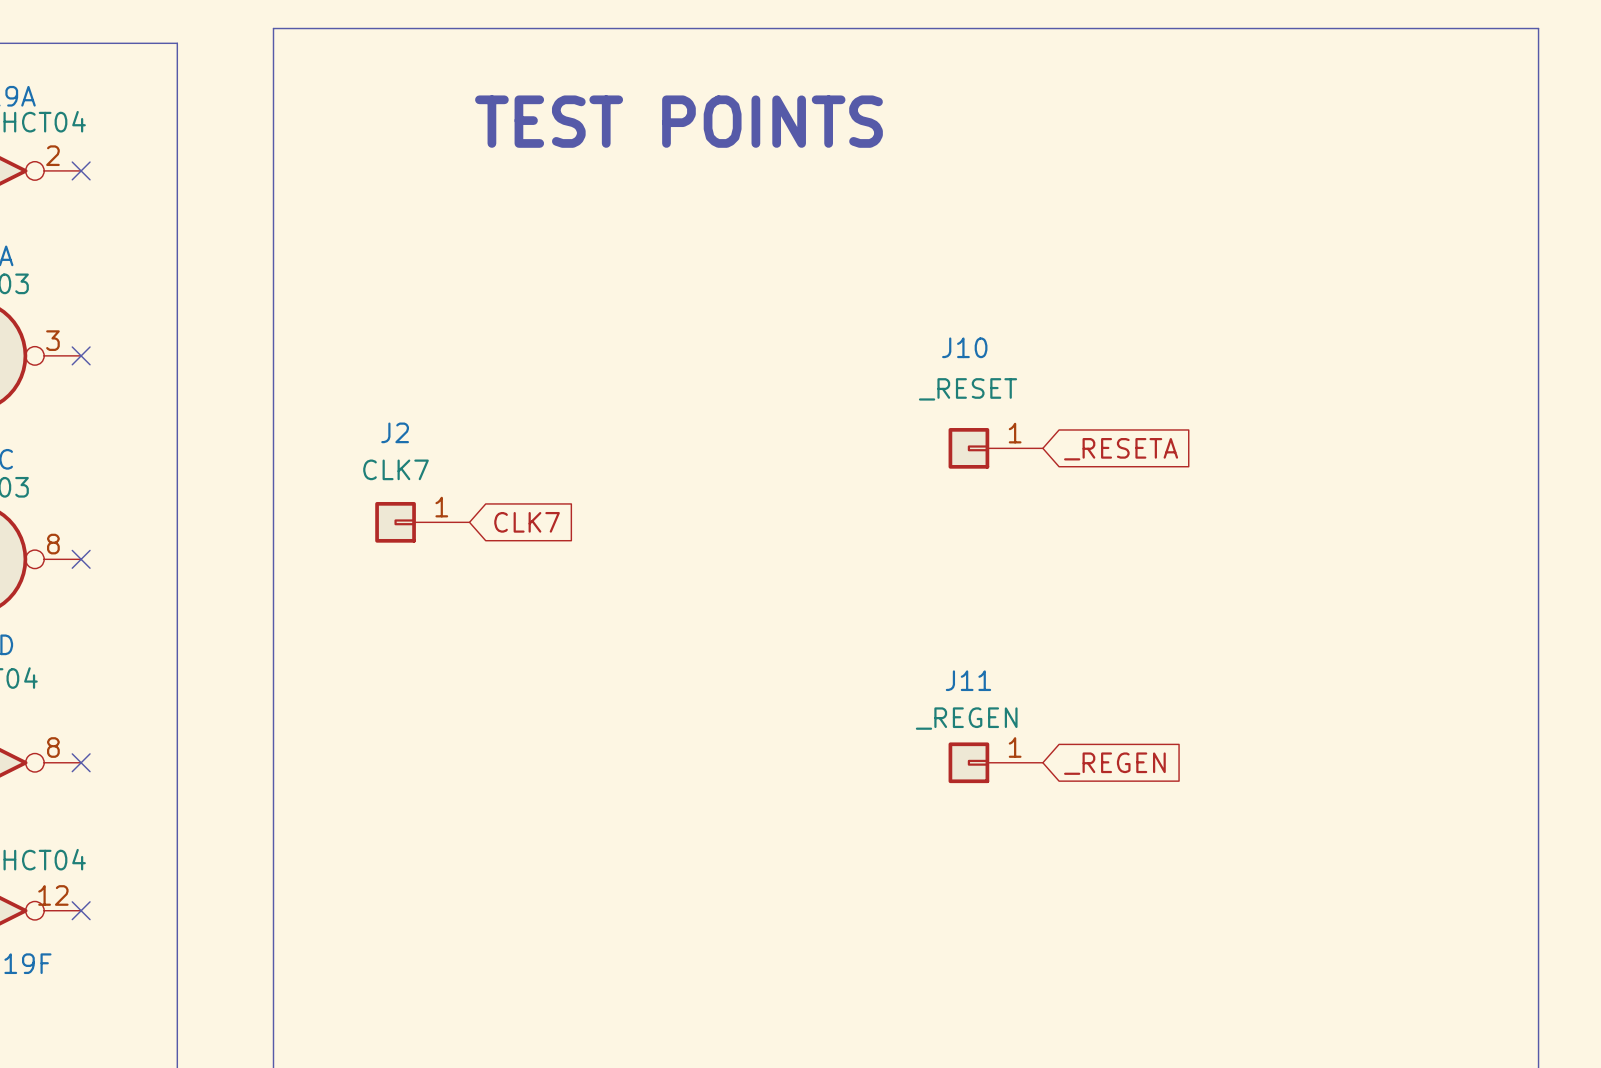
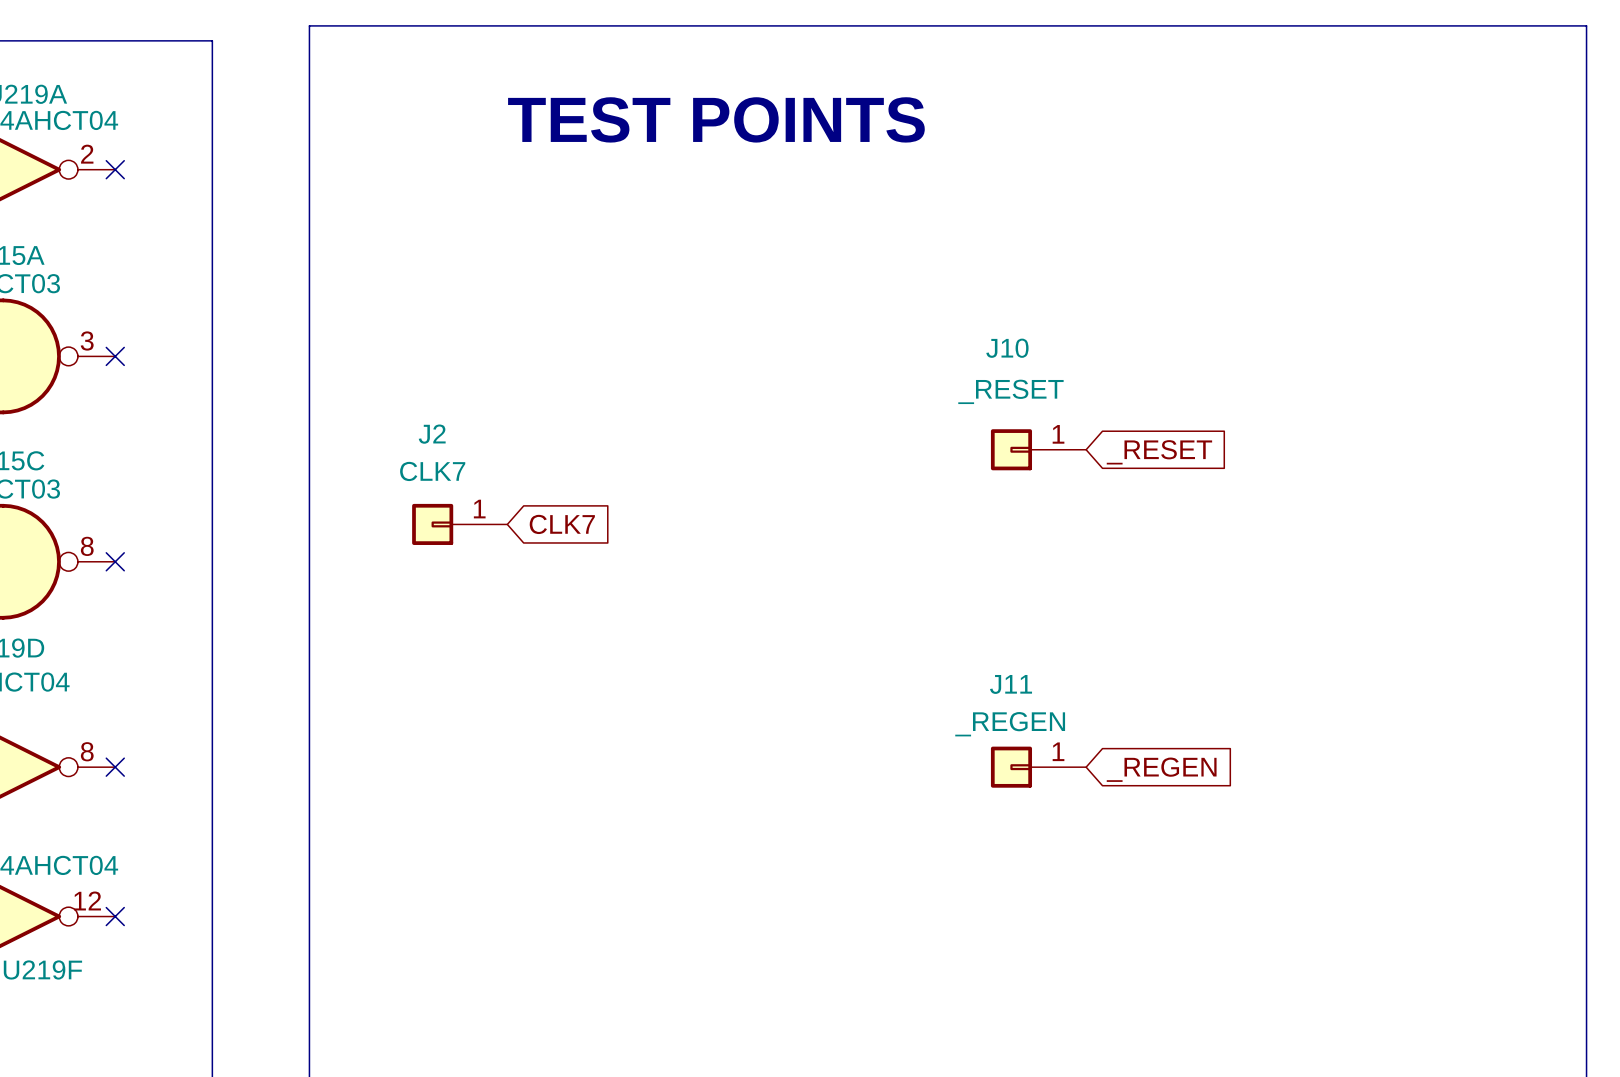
global label: _RESETA (1121, 449) -> _RESET (1159, 452)

